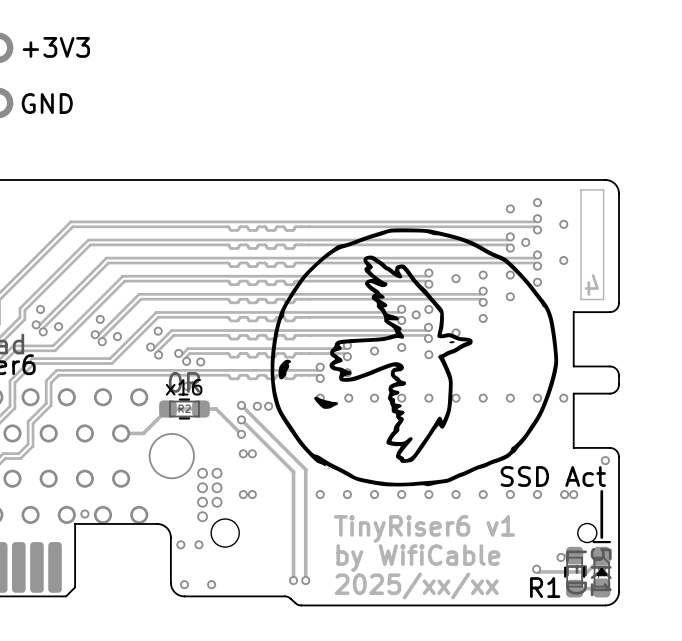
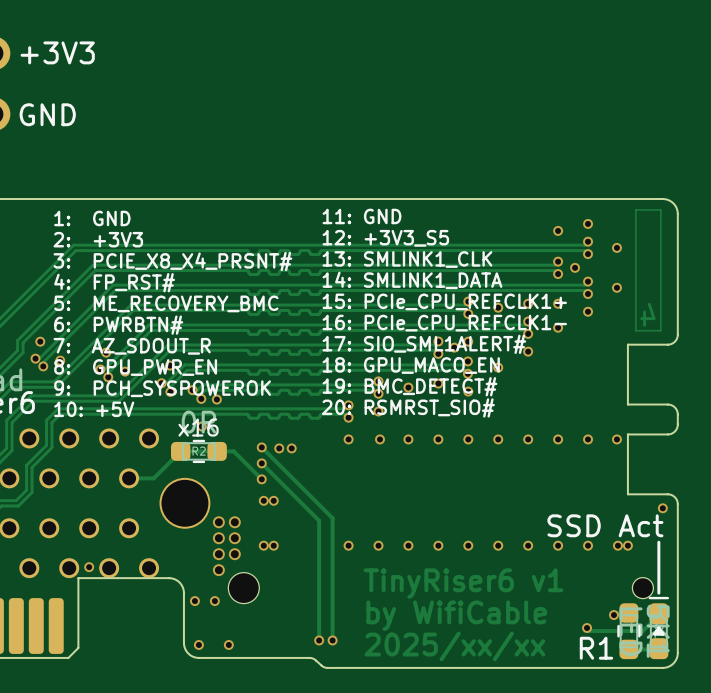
text: none -> 11: GND (361, 216)
text: none -> 1: GND (92, 218)
text: none -> 12: +3V3_S5 (385, 238)
text: none -> 2: +3V3 (98, 239)
drawing: [270, 228, 559, 487] -> none
text: none -> 13: SMLINK1_CLK (407, 259)
text: none -> 3: PCIE_X8_X4_PRSNT# (172, 261)
text: none -> 14: SMLINK1_DATA (412, 280)
text: none -> 4: FP_RST# (114, 282)
text: none -> 15: PCIe_CPU_REFCLK1+ (444, 301)
text: none -> 5: ME_RECOVERY_BMC (166, 303)
text: none -> 16: PCIe_CPU_REFCLK1- (444, 323)
text: none -> 6: PWRBTN# (118, 325)
text: none -> 17: SIO_SML1ALERT# (424, 344)
text: none -> 7: AZ_SDOUT_R (132, 346)
text: none -> 18: GPU_MACO_EN (411, 365)
text: none -> 8: GPU_PWR_EN (135, 367)
text: none -> 19: BMC_DETECT# (409, 386)
text: none -> 9: PCH_SYSPOWEROK (162, 388)
text: none -> 20: RSMRST_SIO# (408, 407)
text: none -> 10: +5V (94, 409)

